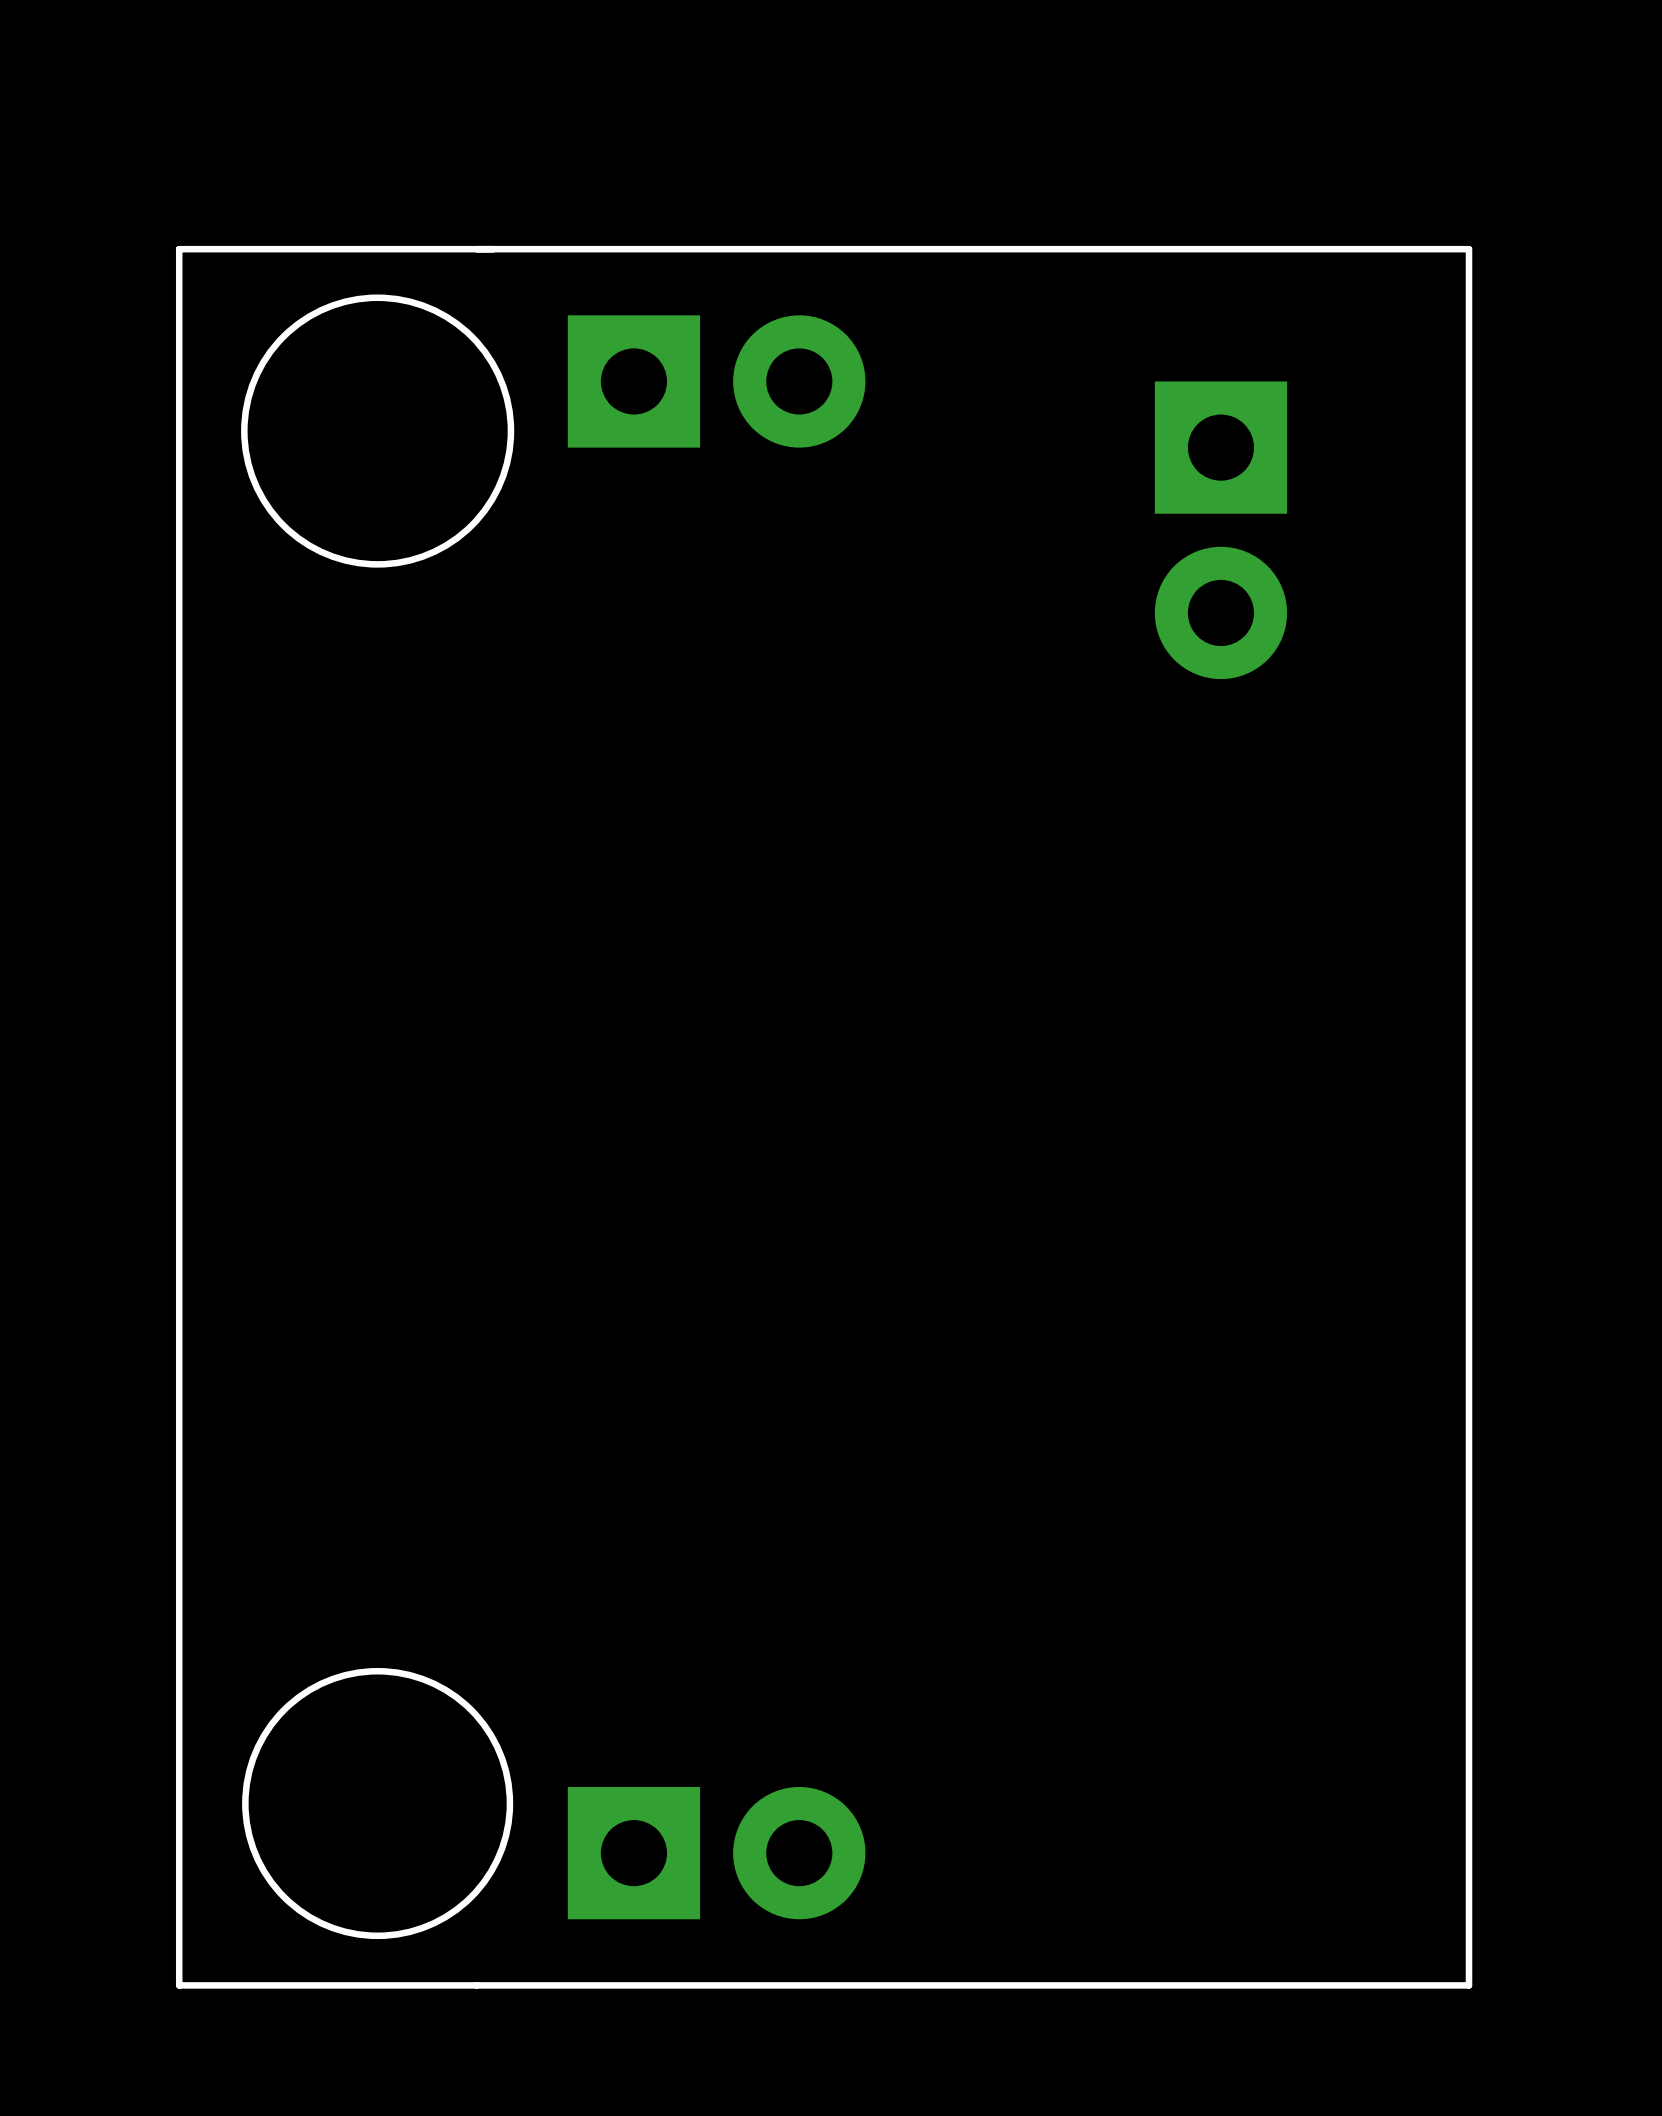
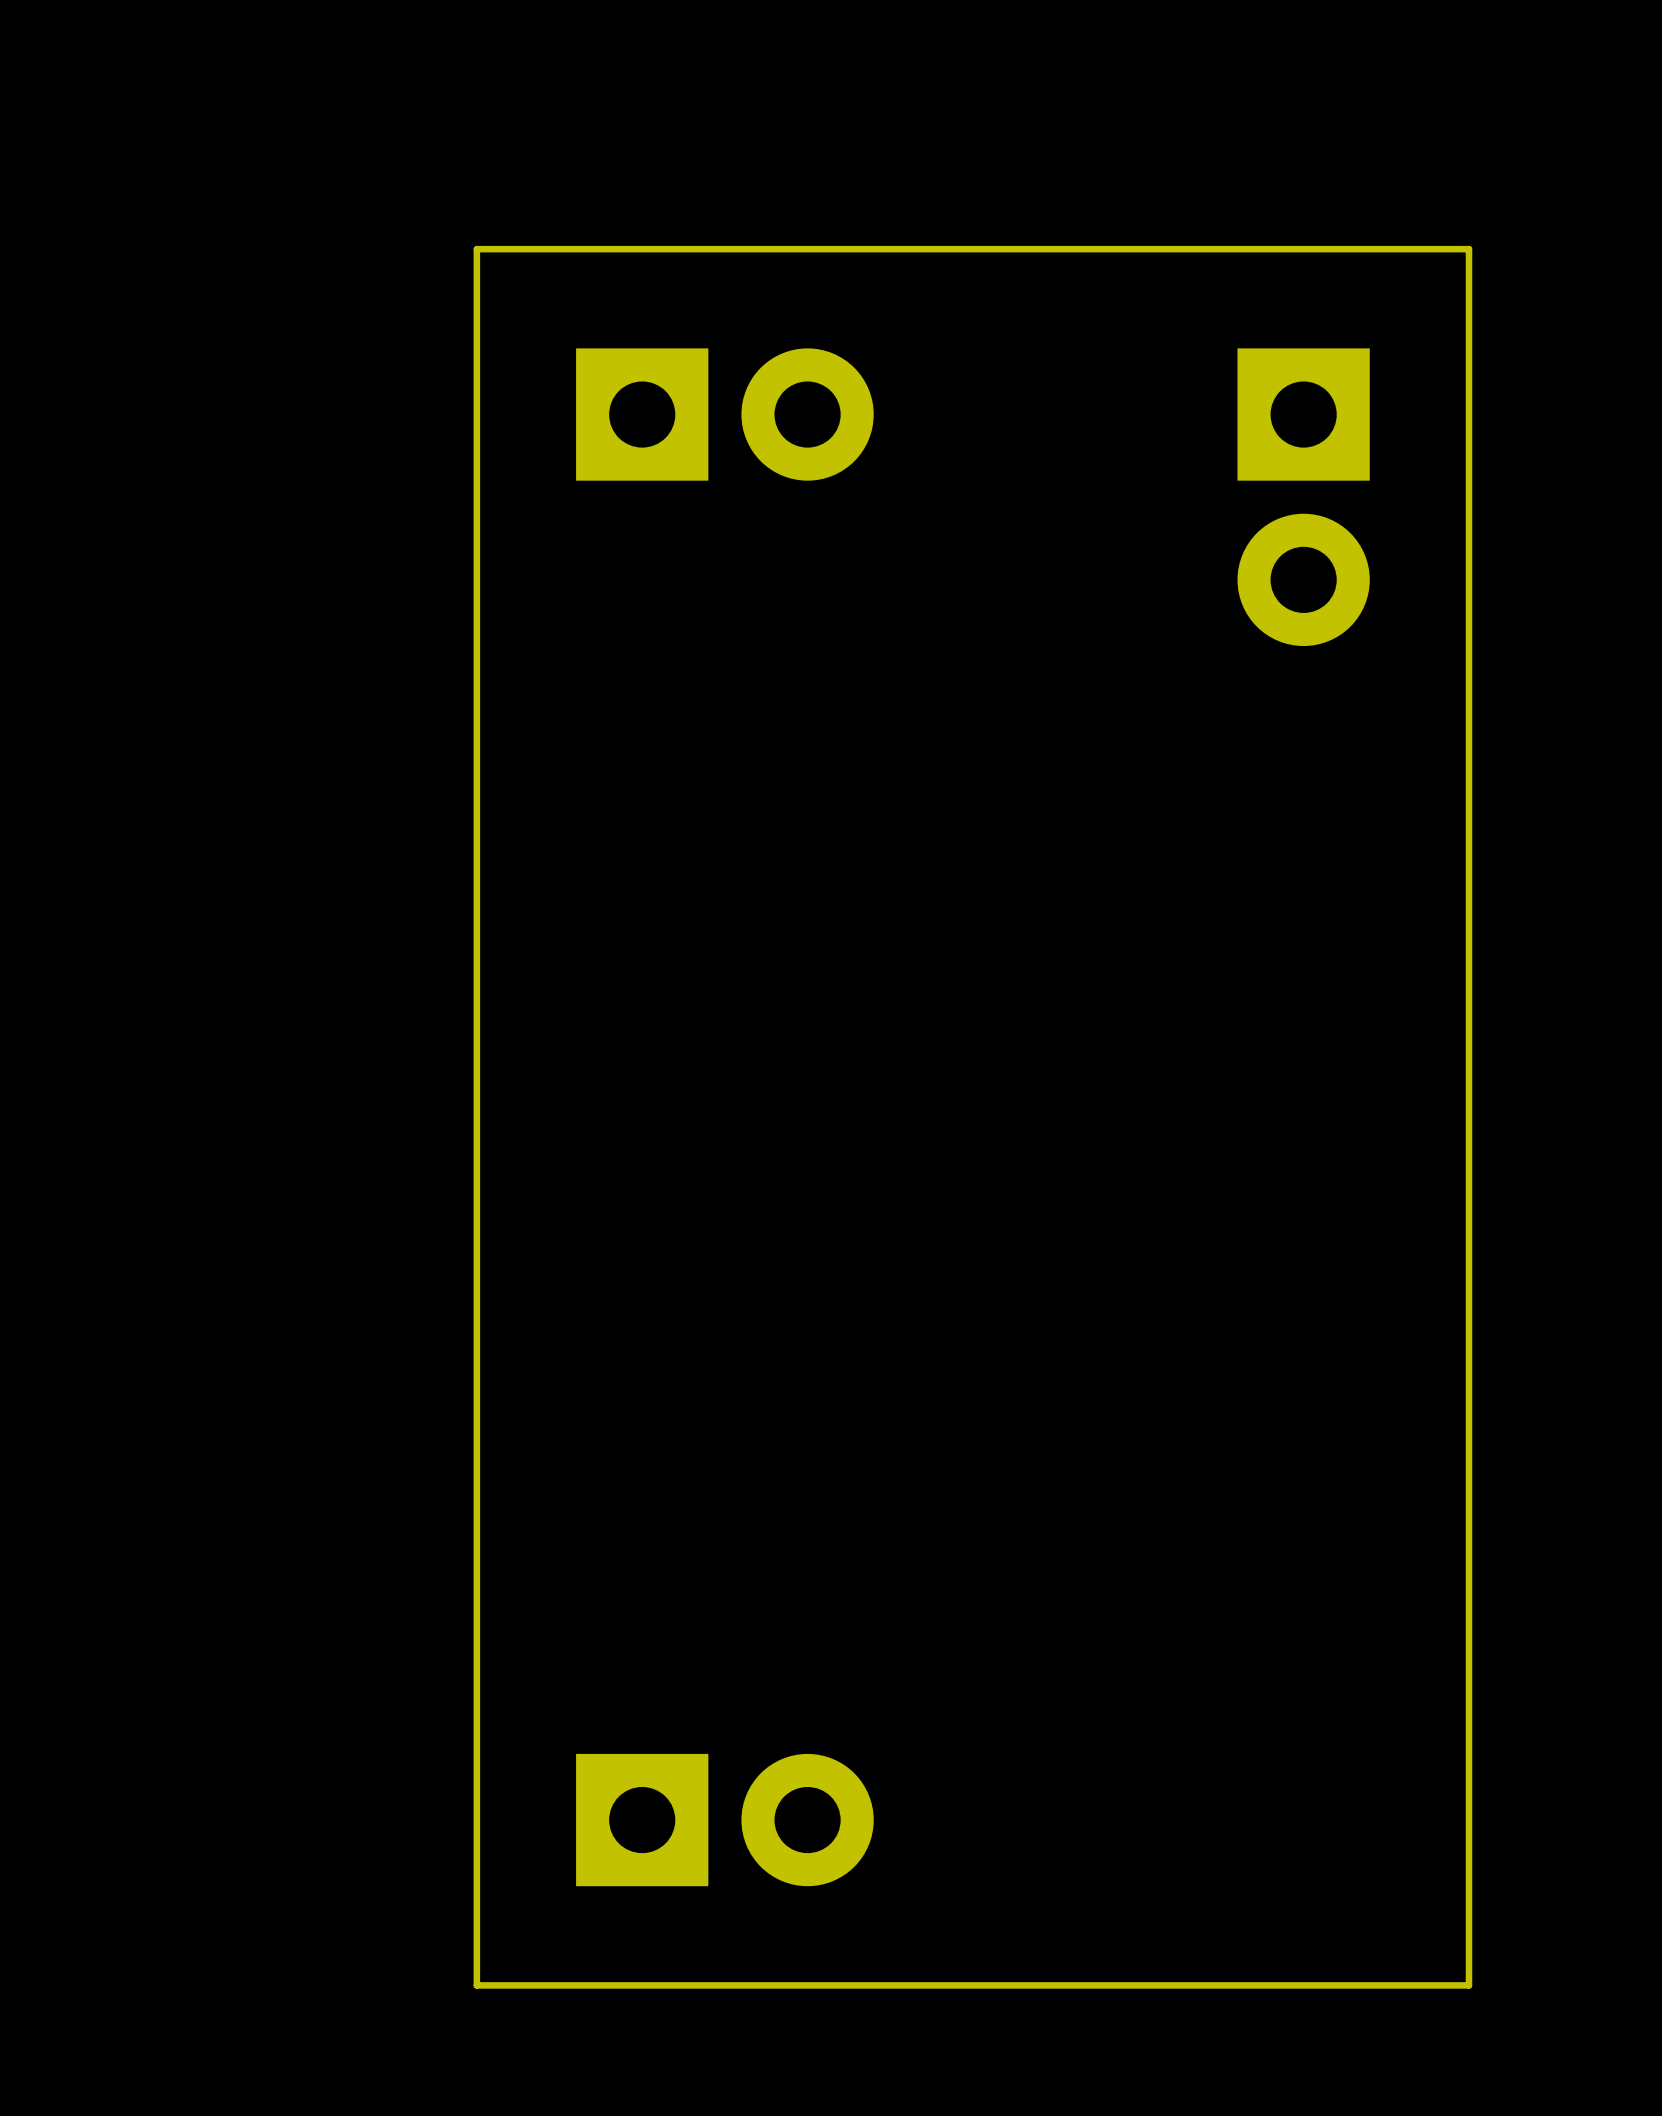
board edge: (476, 249) (179, 249) (179, 1985) (476, 1985) -> (476, 249) (476, 1985)
round board edge: [241, 294, 515, 568] -> none
part position: (716, 381) -> (724, 414)
part position: (1220, 530) -> (1303, 497)
round board edge: [242, 1667, 514, 1940] -> none
part position: (716, 1853) -> (724, 1820)

